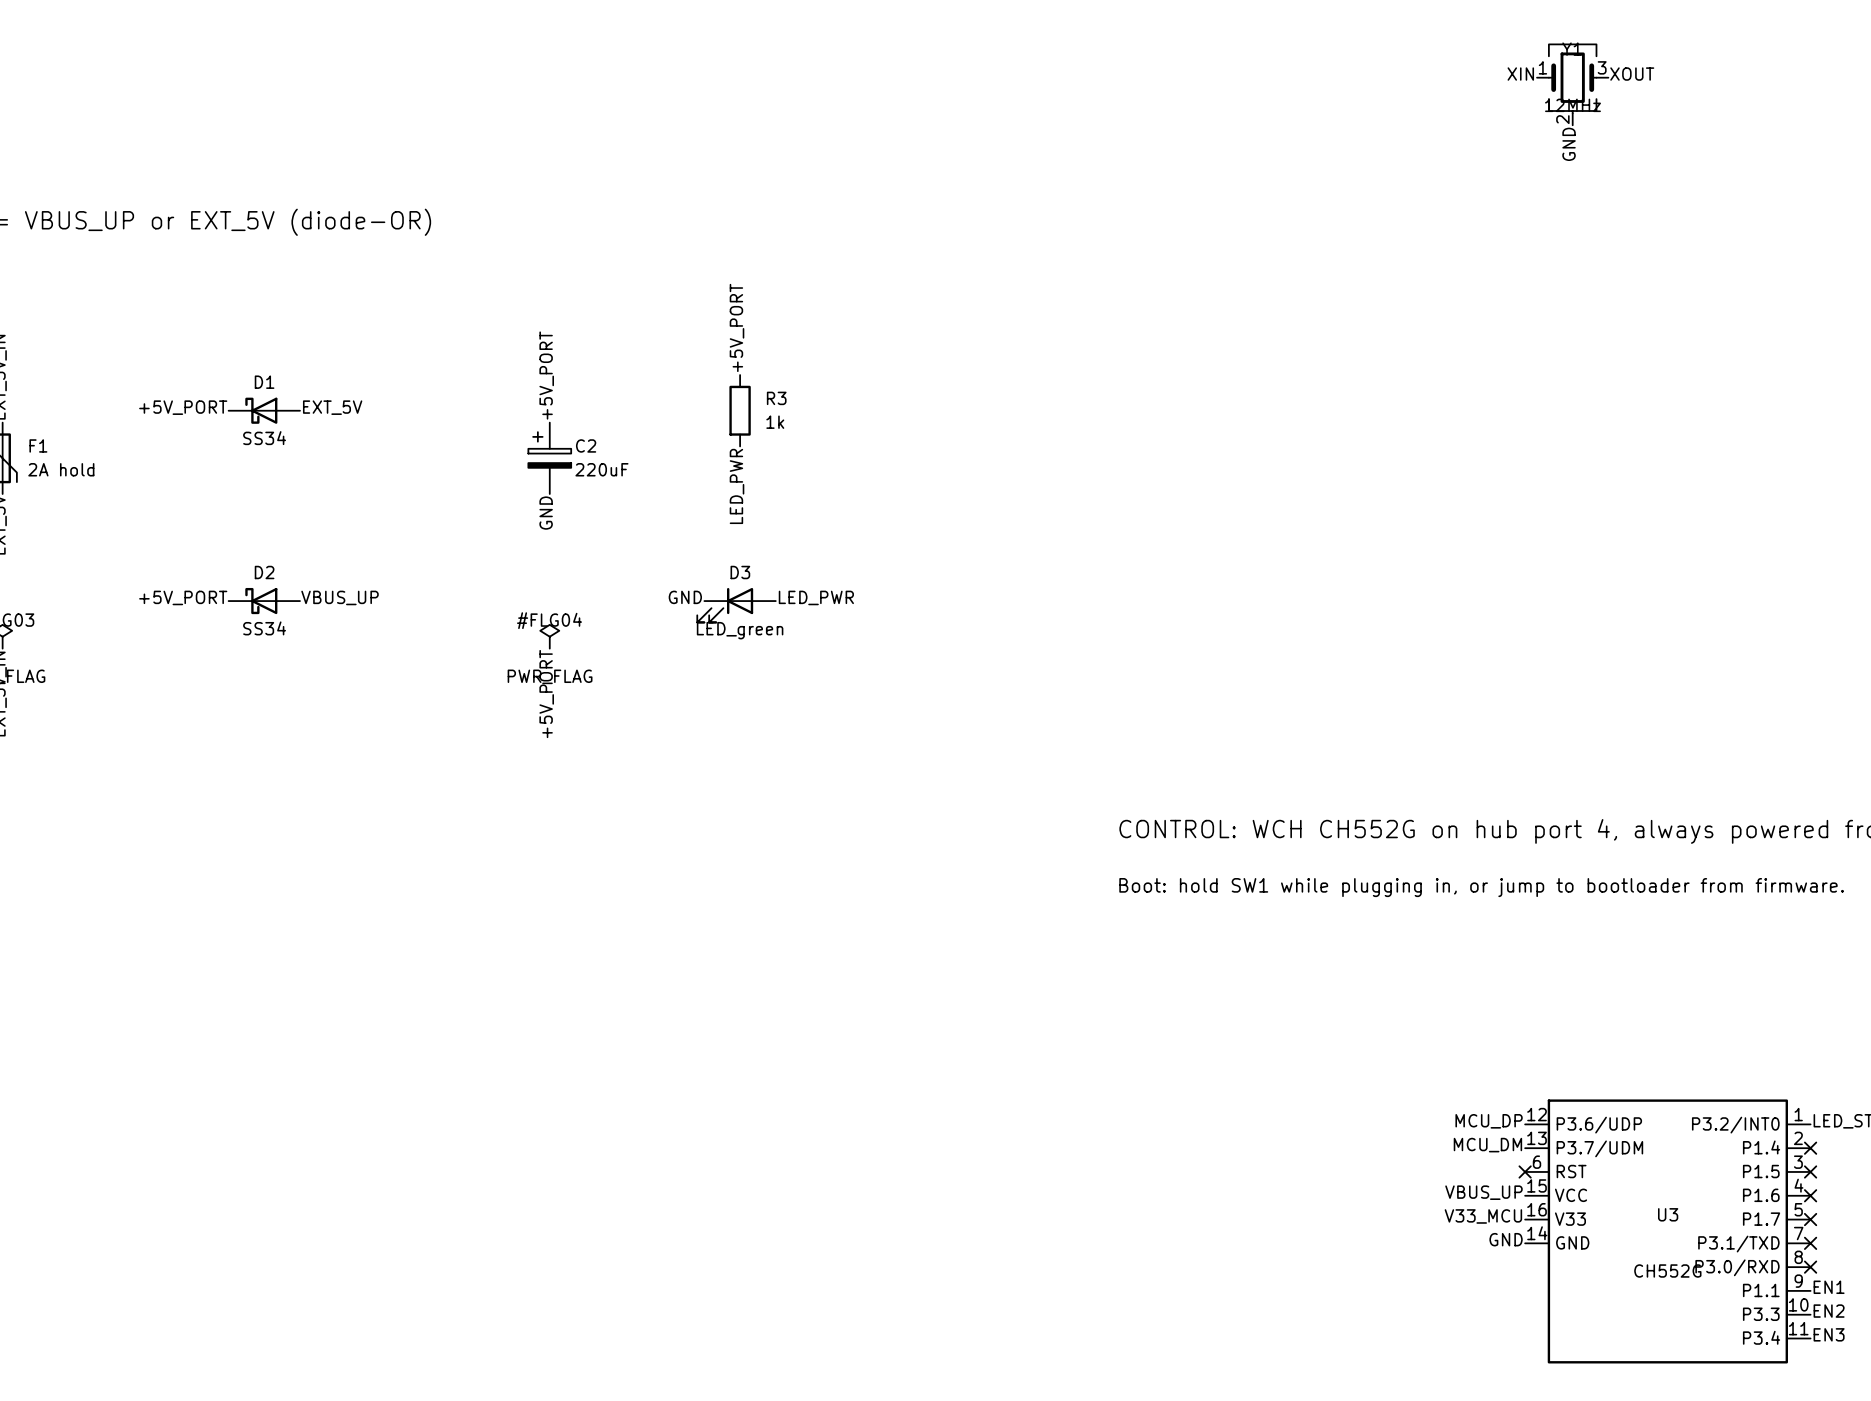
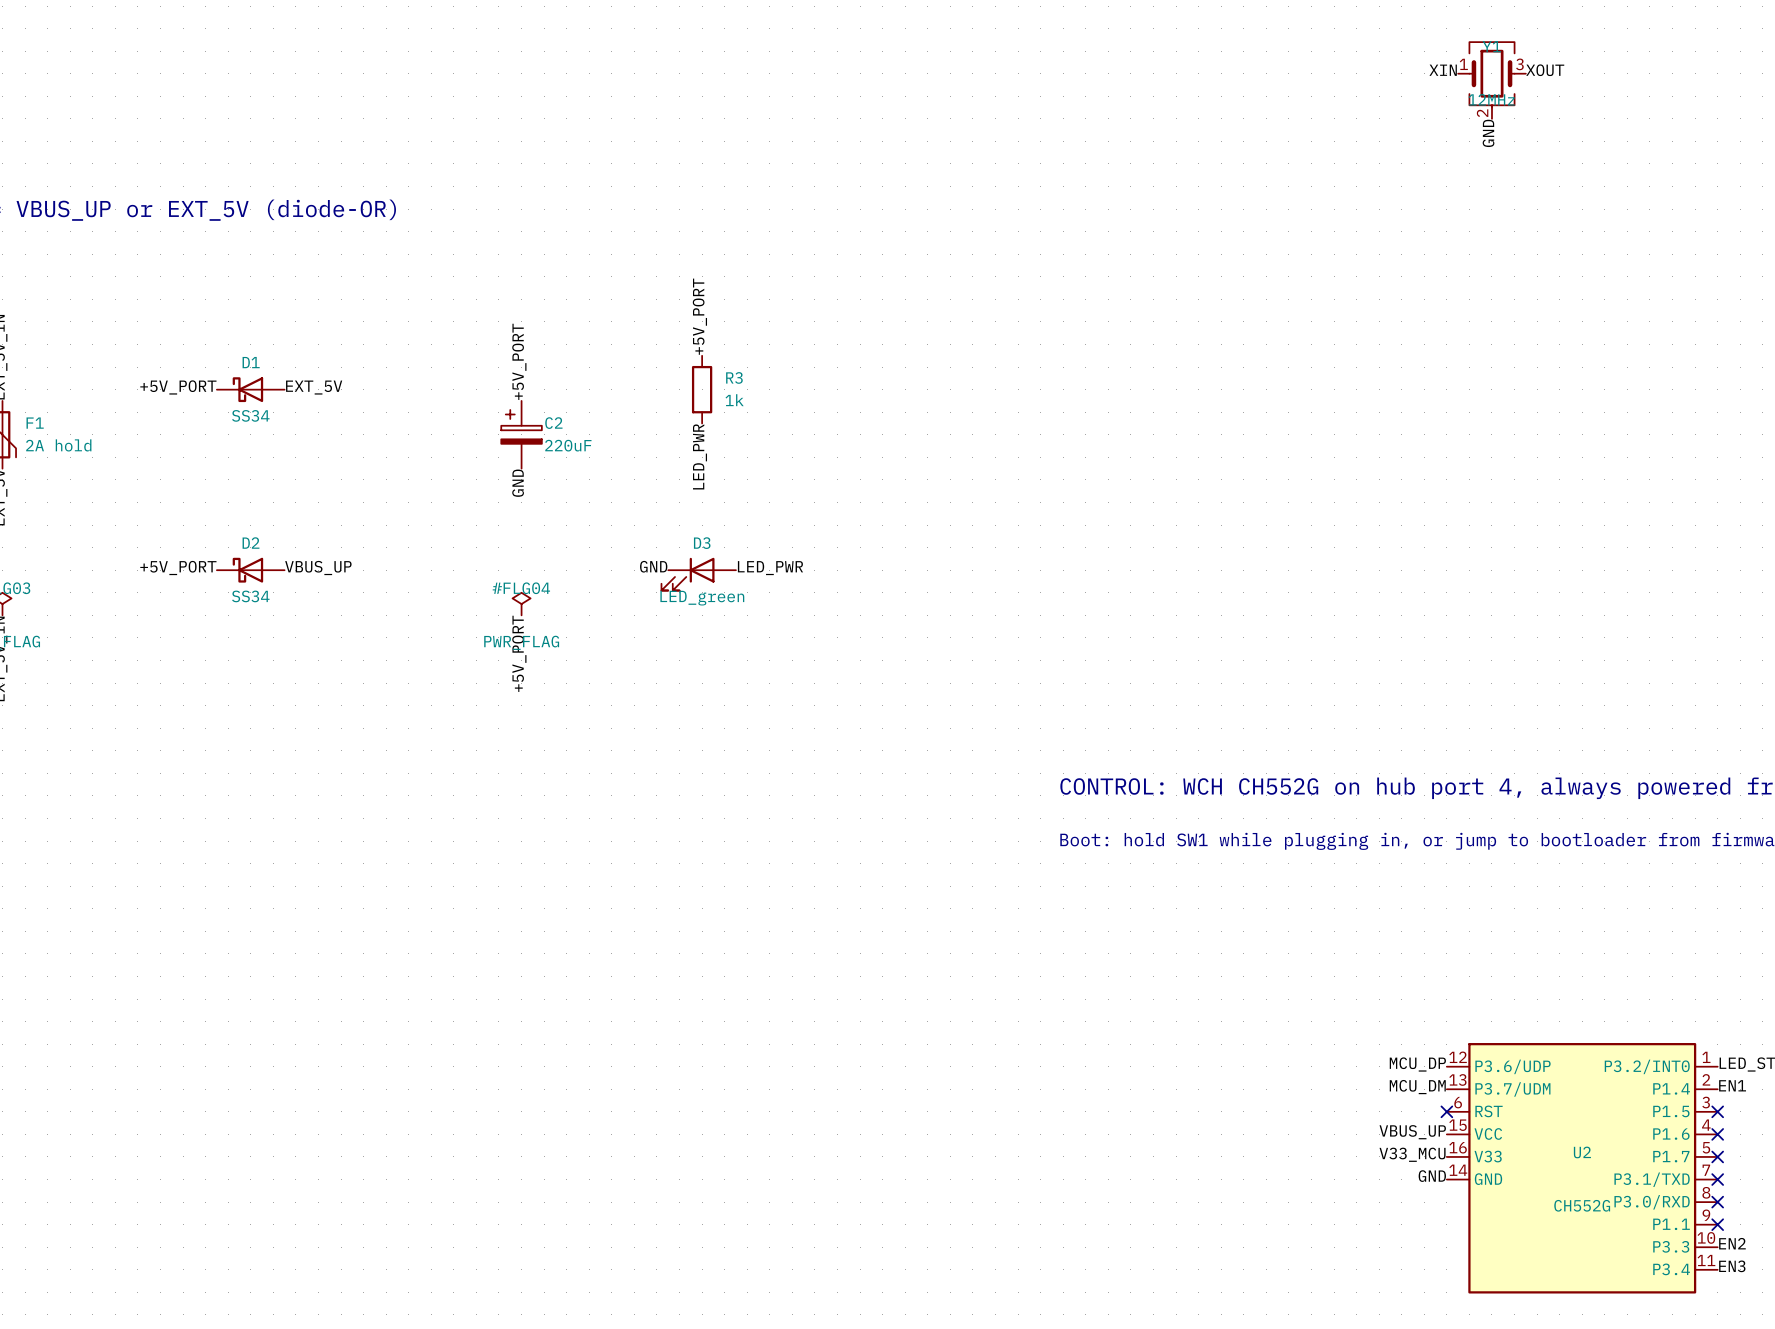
no-connect mark: (1810, 1148) -> none
U3 name: U3 (1668, 1214) -> U2 (1582, 1152)
label position: EN1 (1829, 1287) -> EN1 (1732, 1085)
no-connect mark: none -> (1717, 1224)

